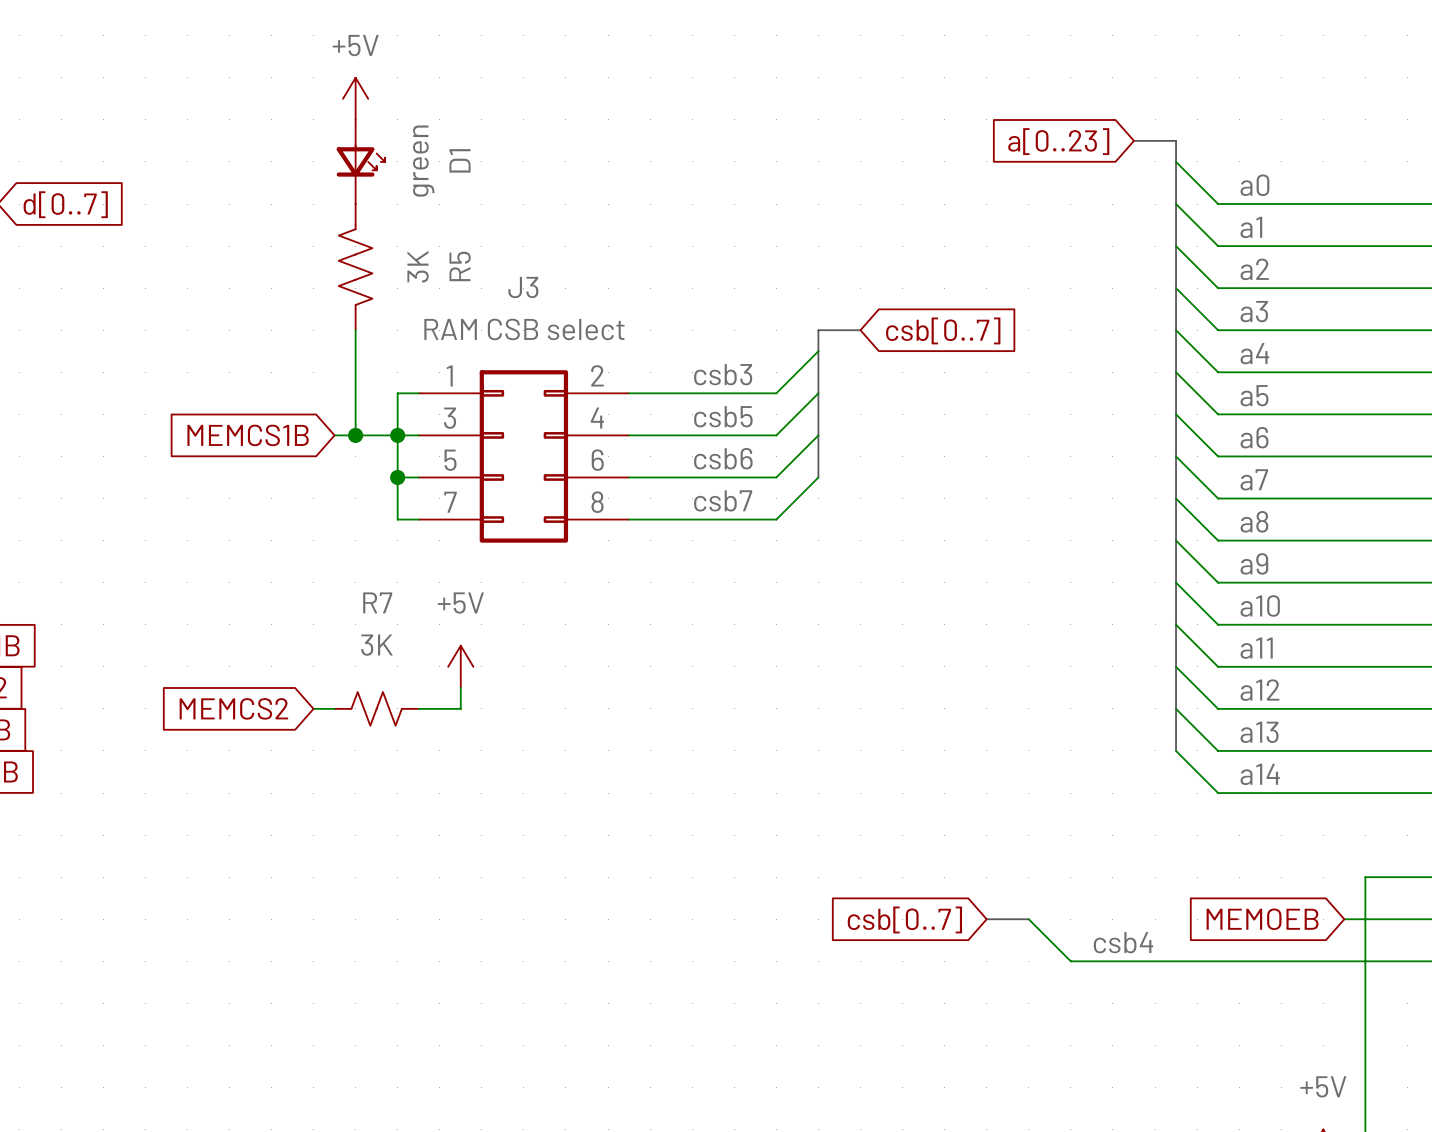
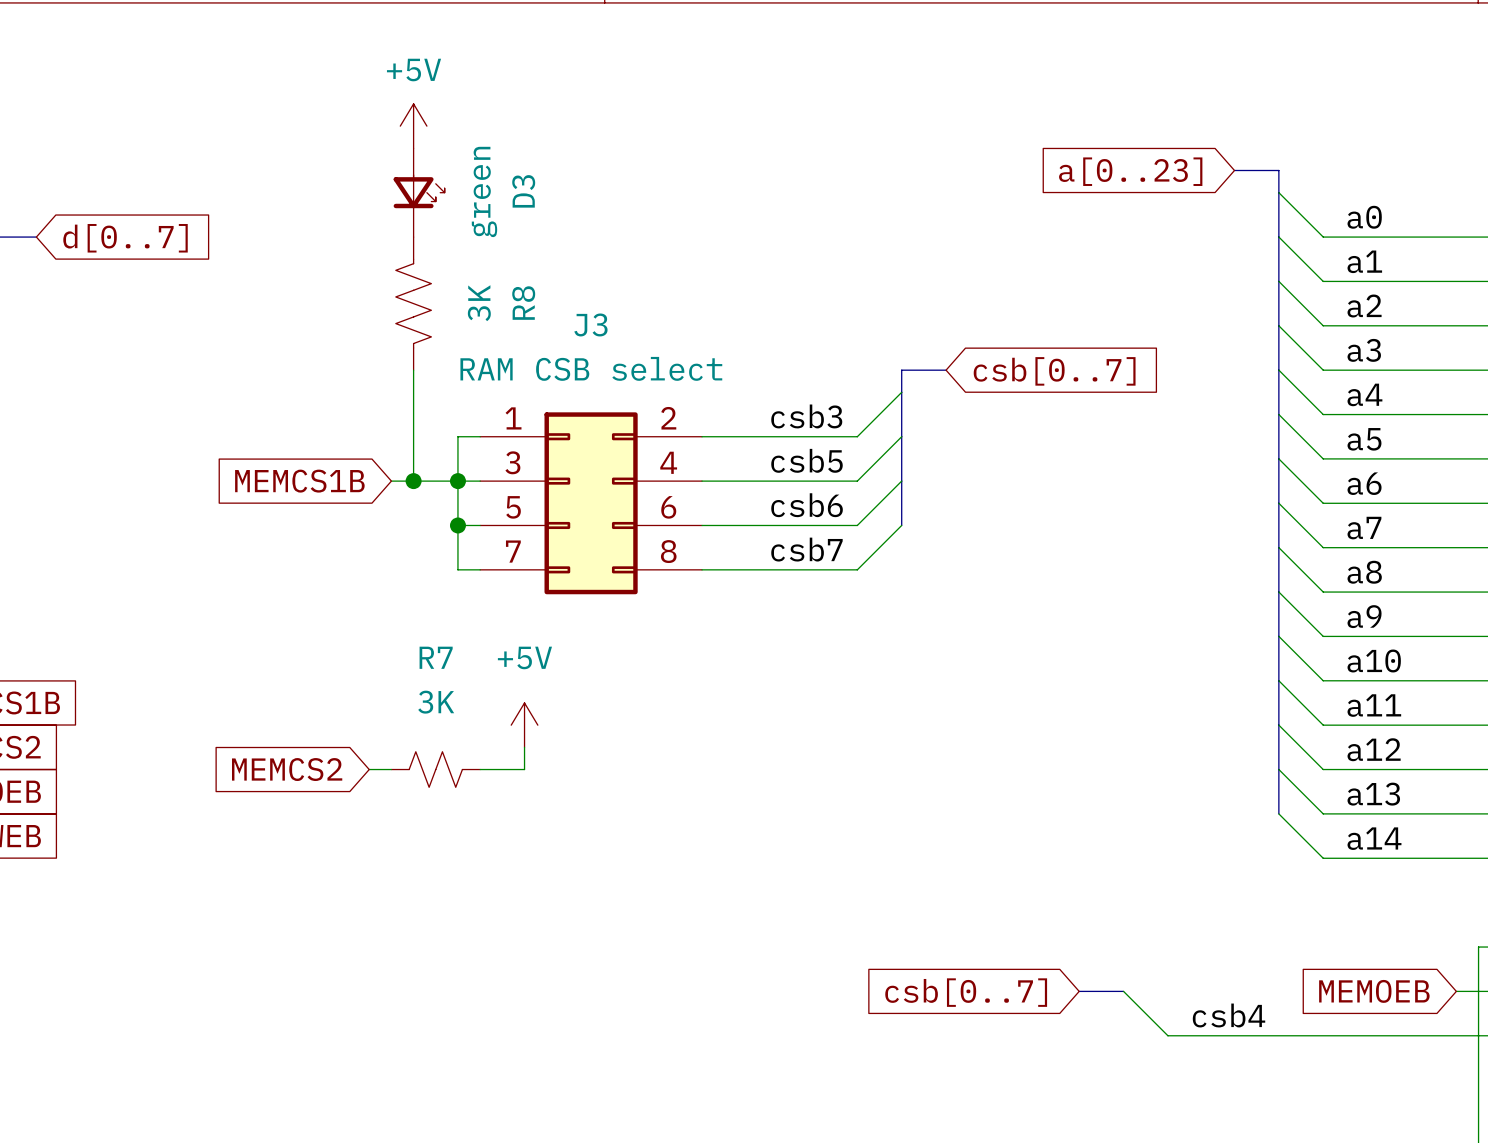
D1 name: D1 (460, 160) -> D3 (523, 191)
R5 name: R5 (460, 266) -> R8 (523, 303)

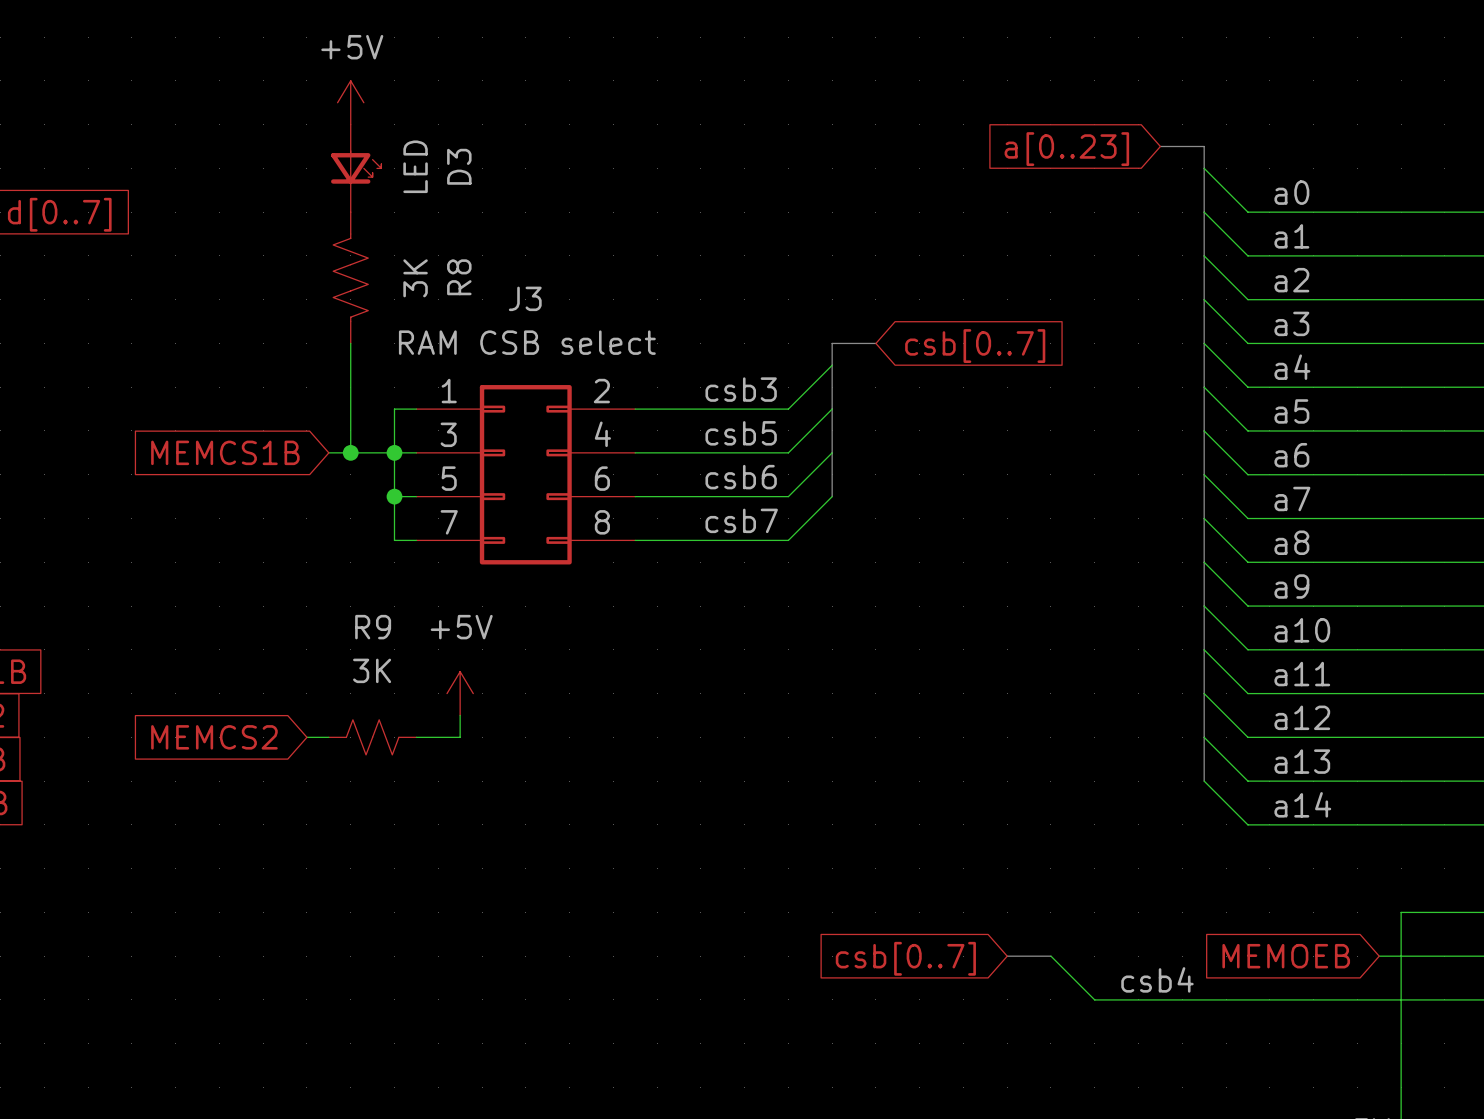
D3 value: green (484, 191) -> LED (415, 166)
R7 name: R7 (436, 657) -> R9 (373, 627)

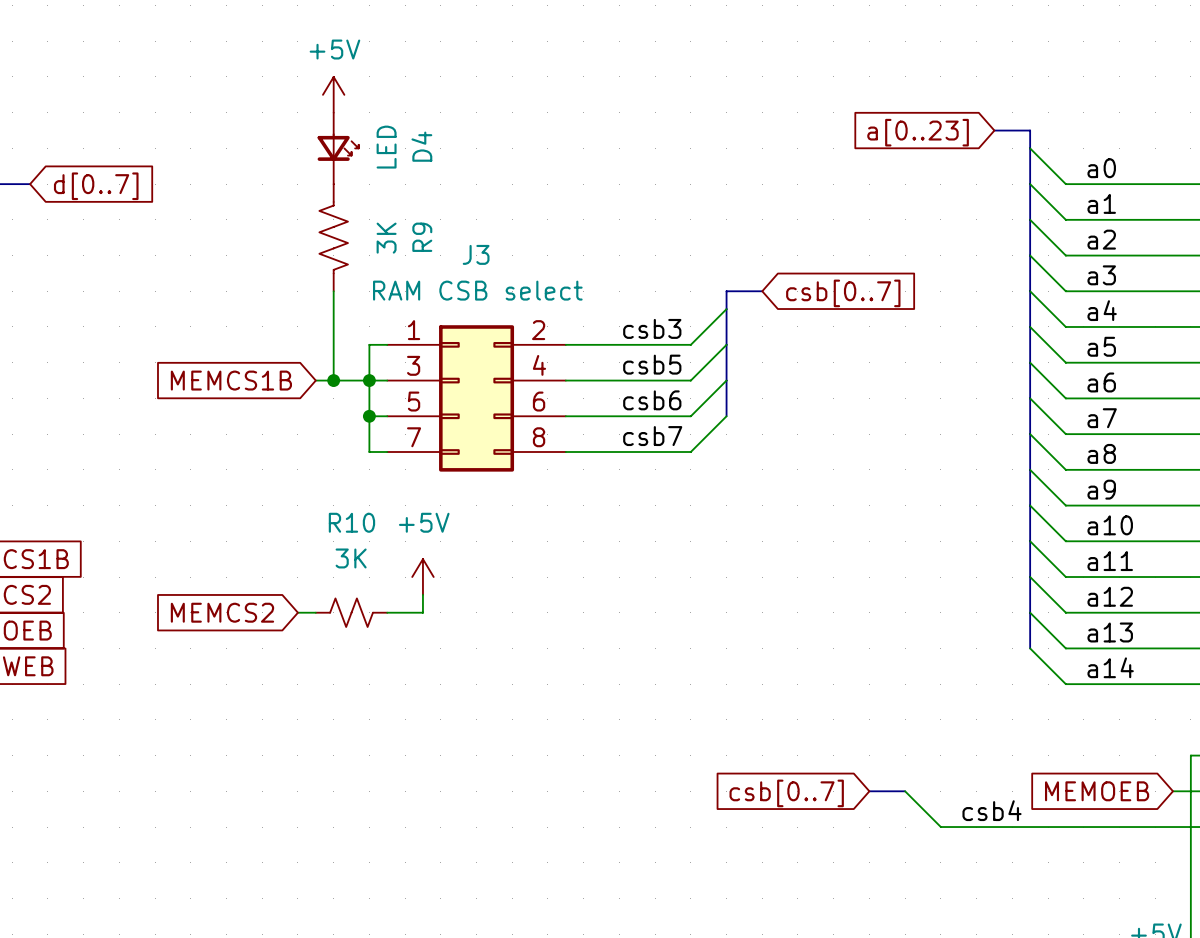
D3 name: D3 (459, 166) -> D4 (421, 146)
R8 name: R8 (459, 277) -> R9 (422, 237)
R9 name: R9 (373, 627) -> R10 (351, 522)

